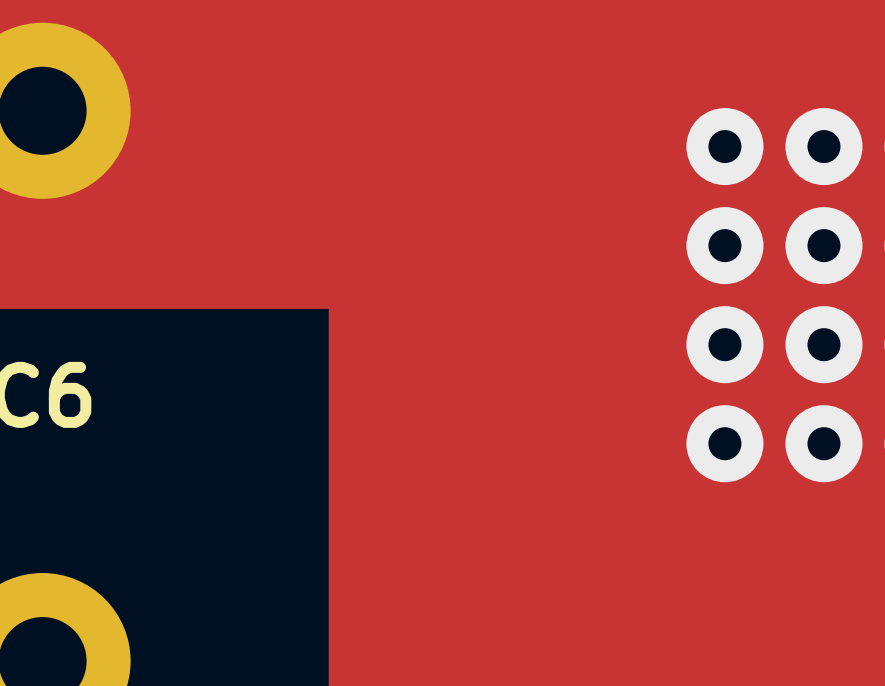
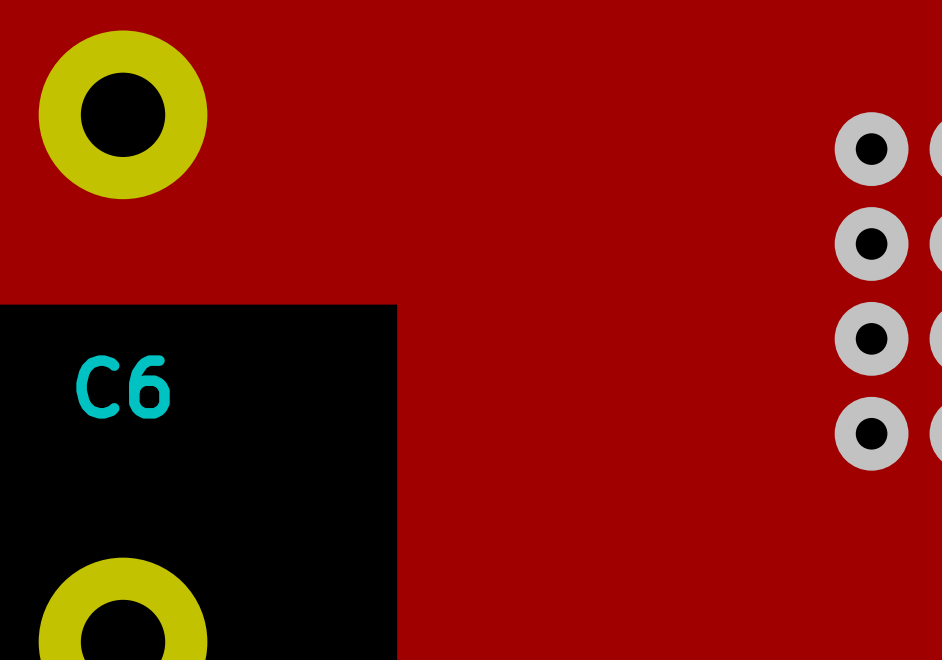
via: (724, 146) -> none
via: (724, 245) -> none
via: (724, 344) -> none
via: (724, 443) -> none

